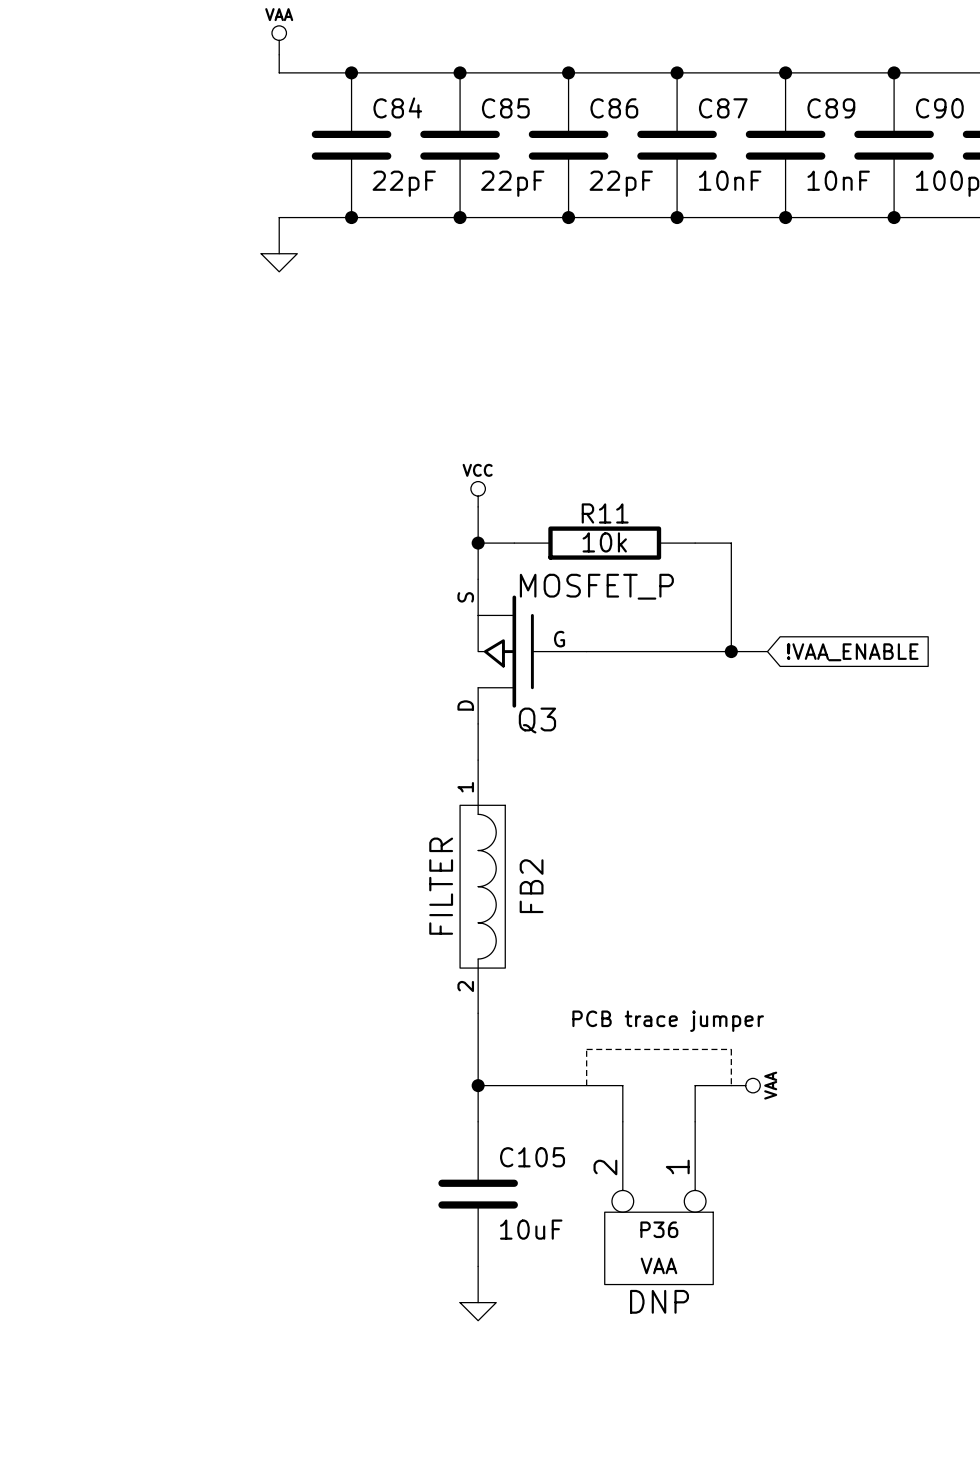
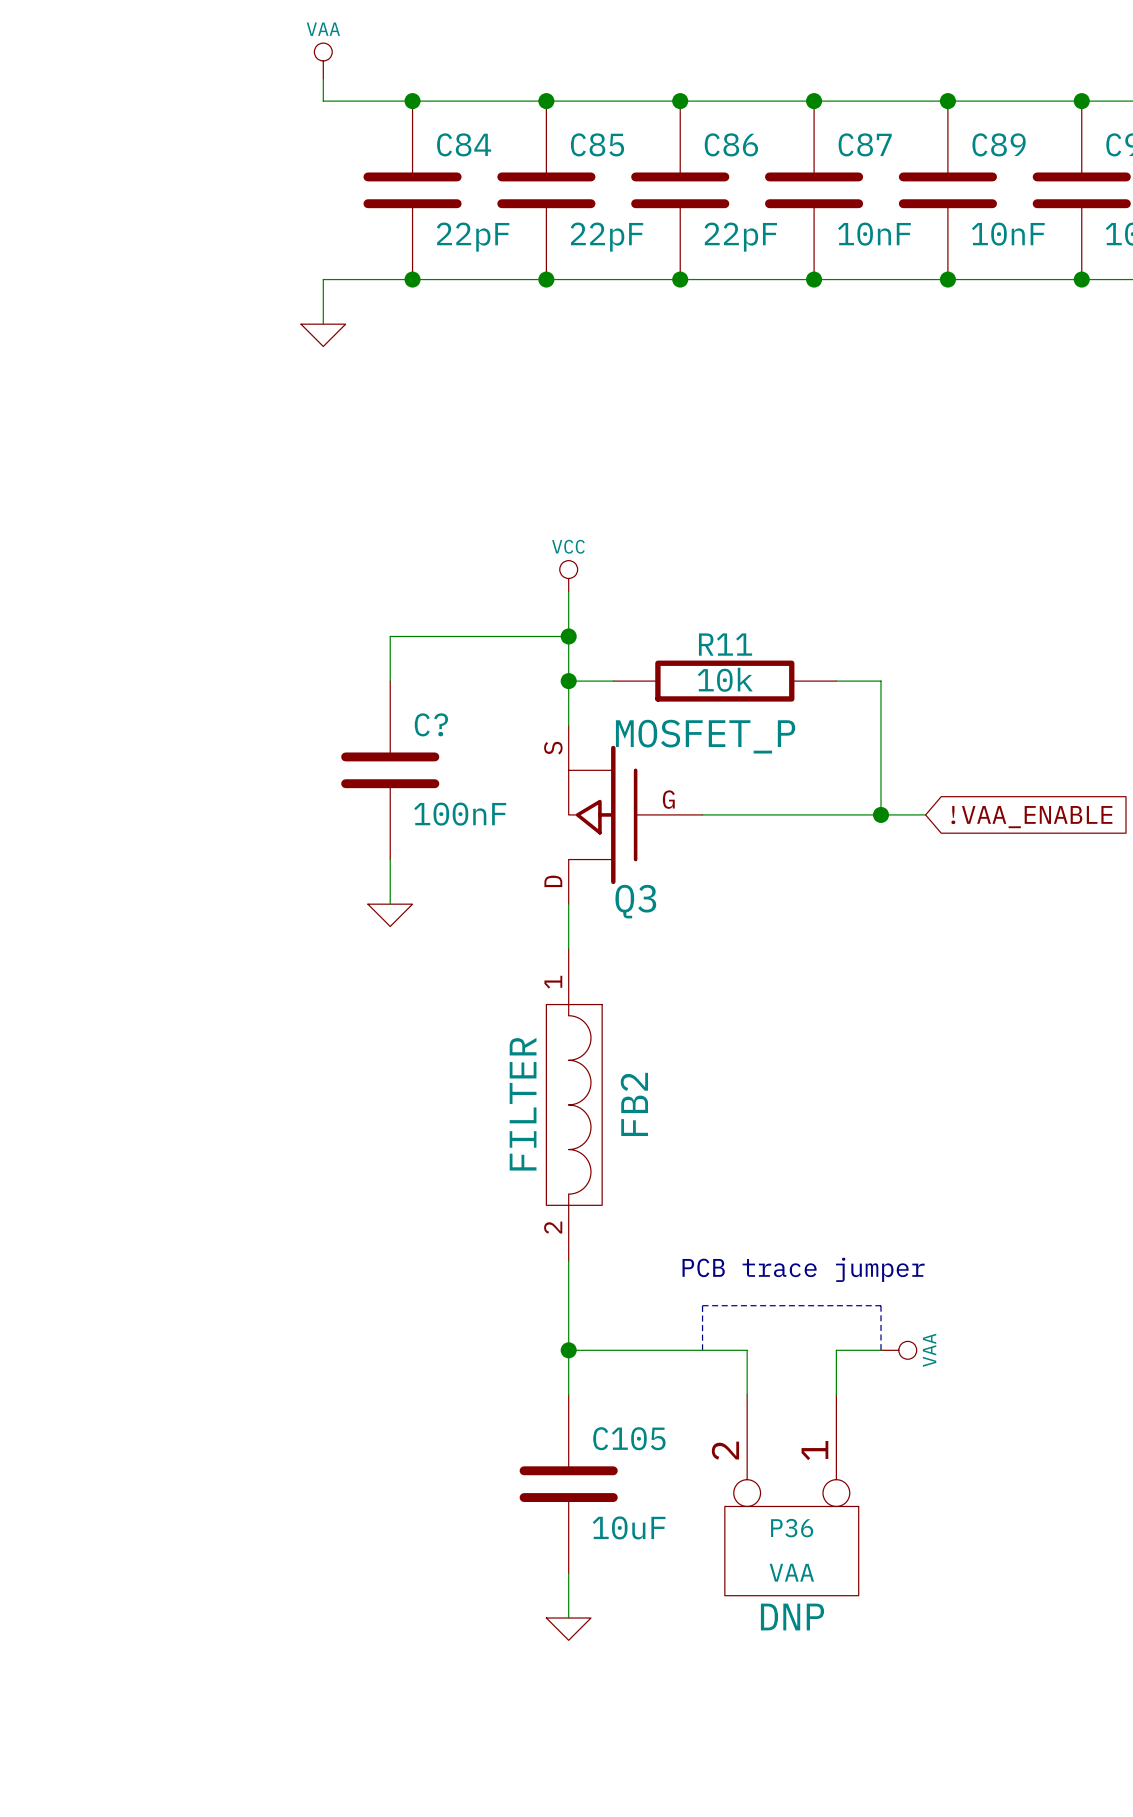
wire: none -> (568, 591) (568, 636) (390, 636) (390, 681)
power symbol position: VCC (478, 494) -> VCC (568, 576)
junction: none -> (568, 636)
C?: none -> 100nF (390, 770)
wire: none -> (390, 859) (390, 904)
power symbol: none -> (390, 915)

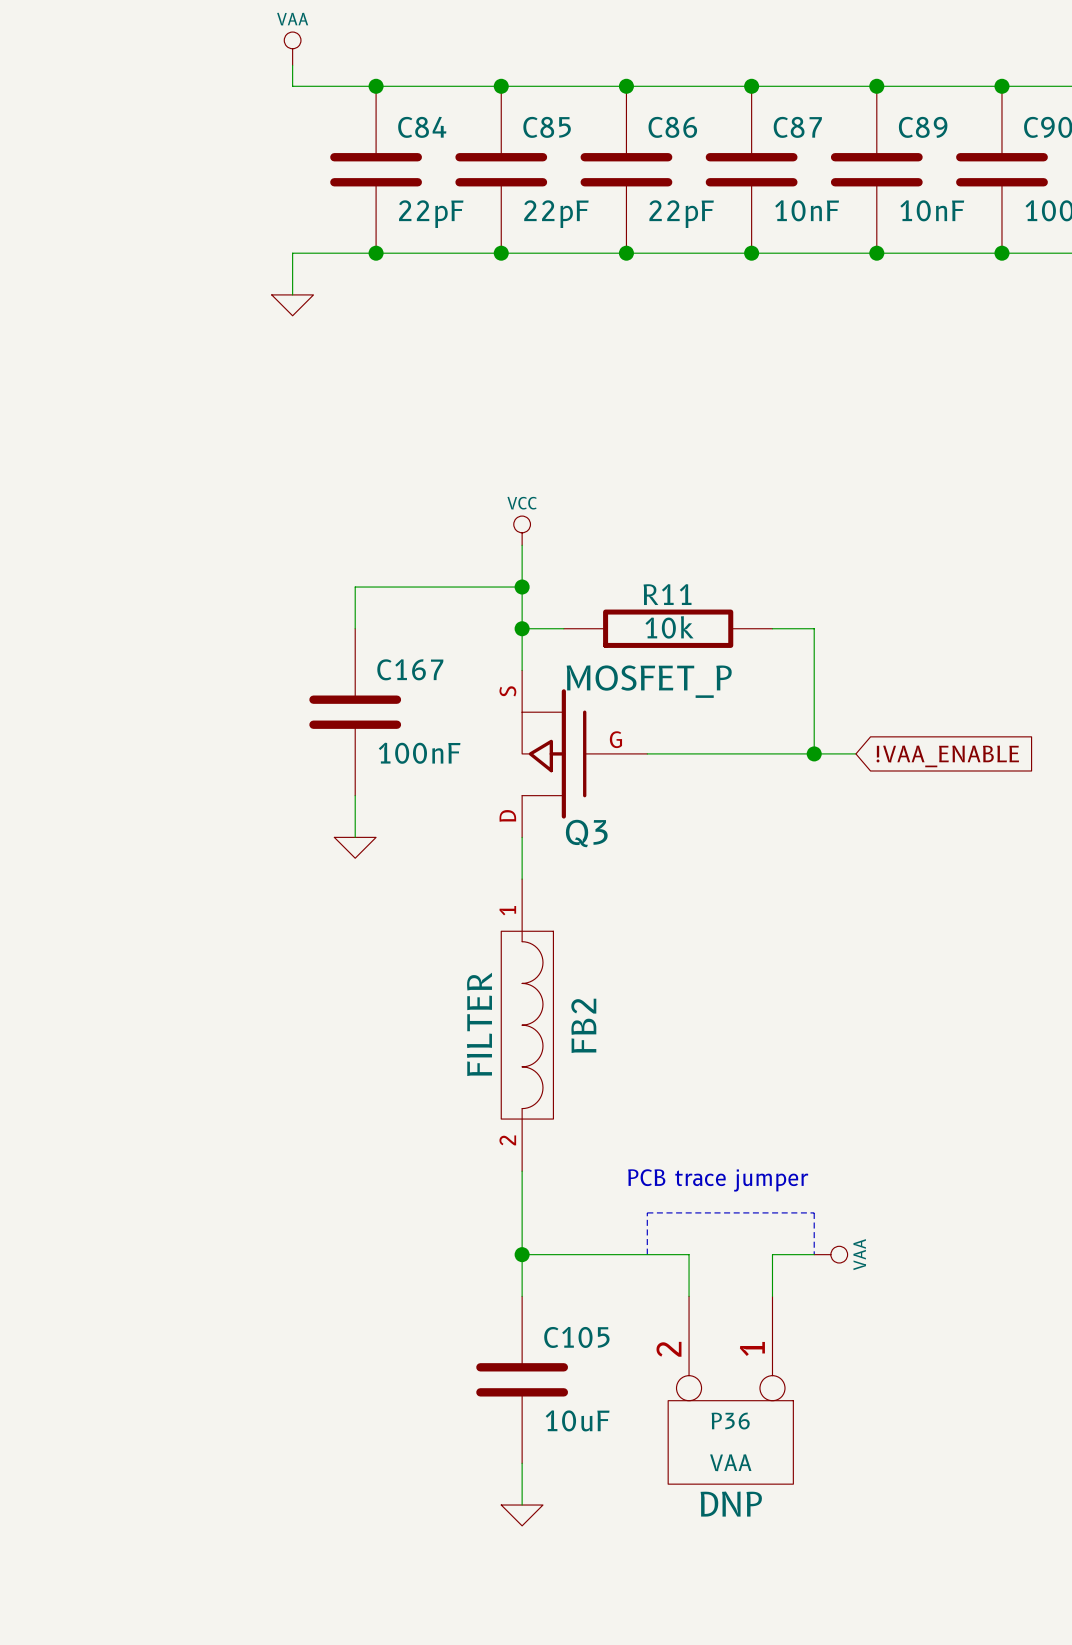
C? name: C? (431, 724) -> C167 (410, 669)

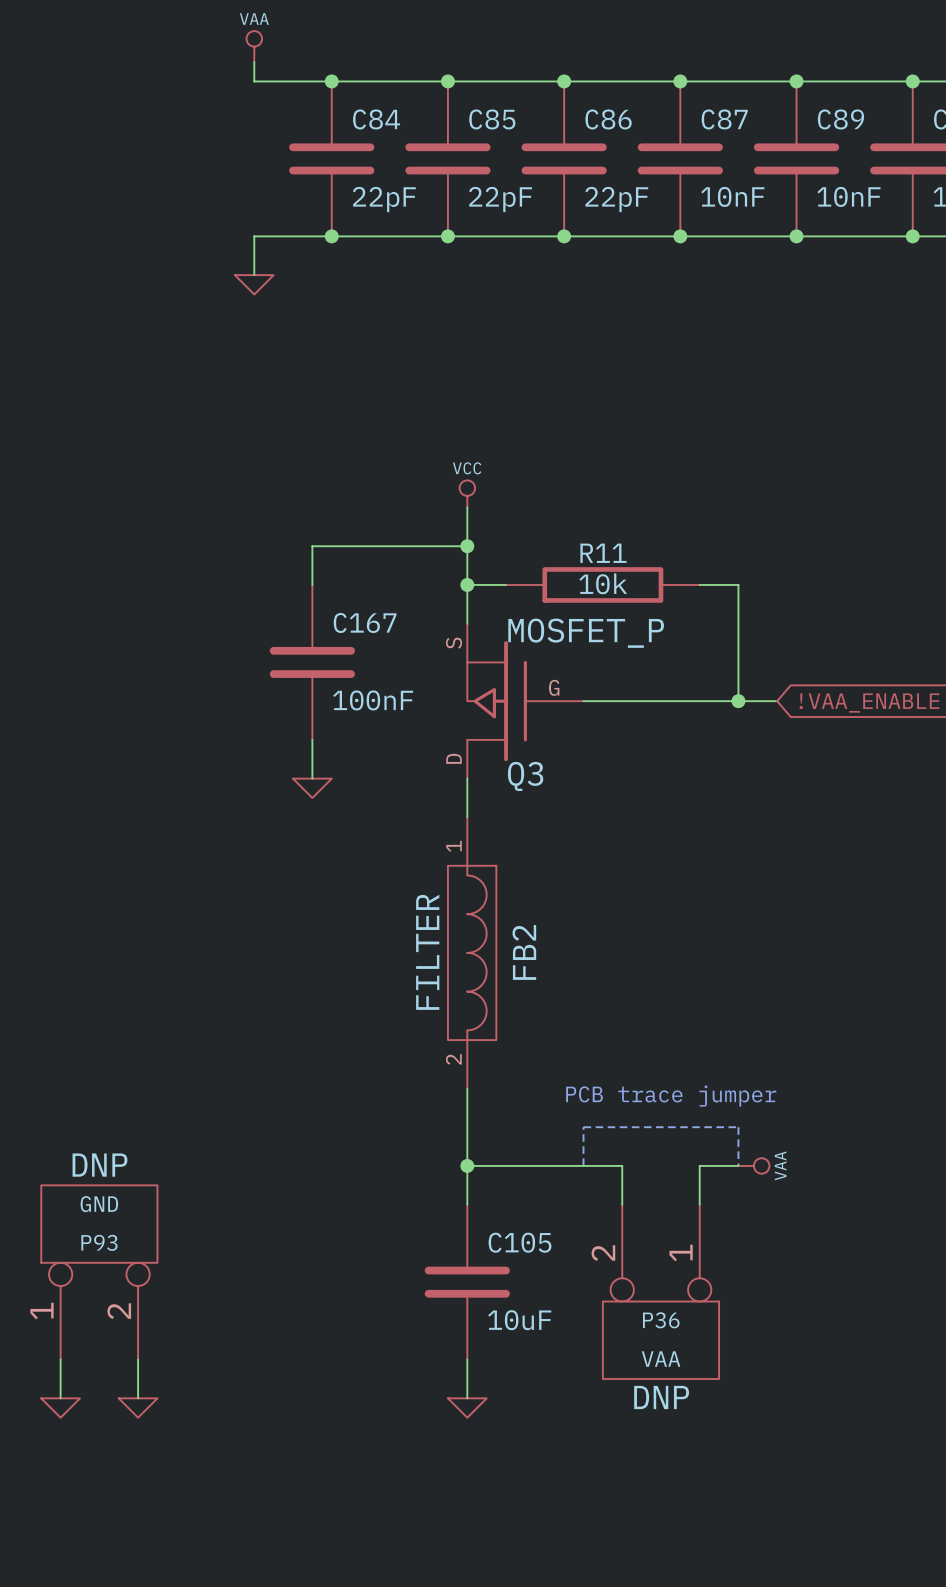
P93: none -> GND (99, 1272)
wire: none -> (60, 1359) (60, 1398)
wire: none -> (138, 1359) (138, 1398)
power symbol: none -> (60, 1408)
power symbol: none -> (138, 1408)

